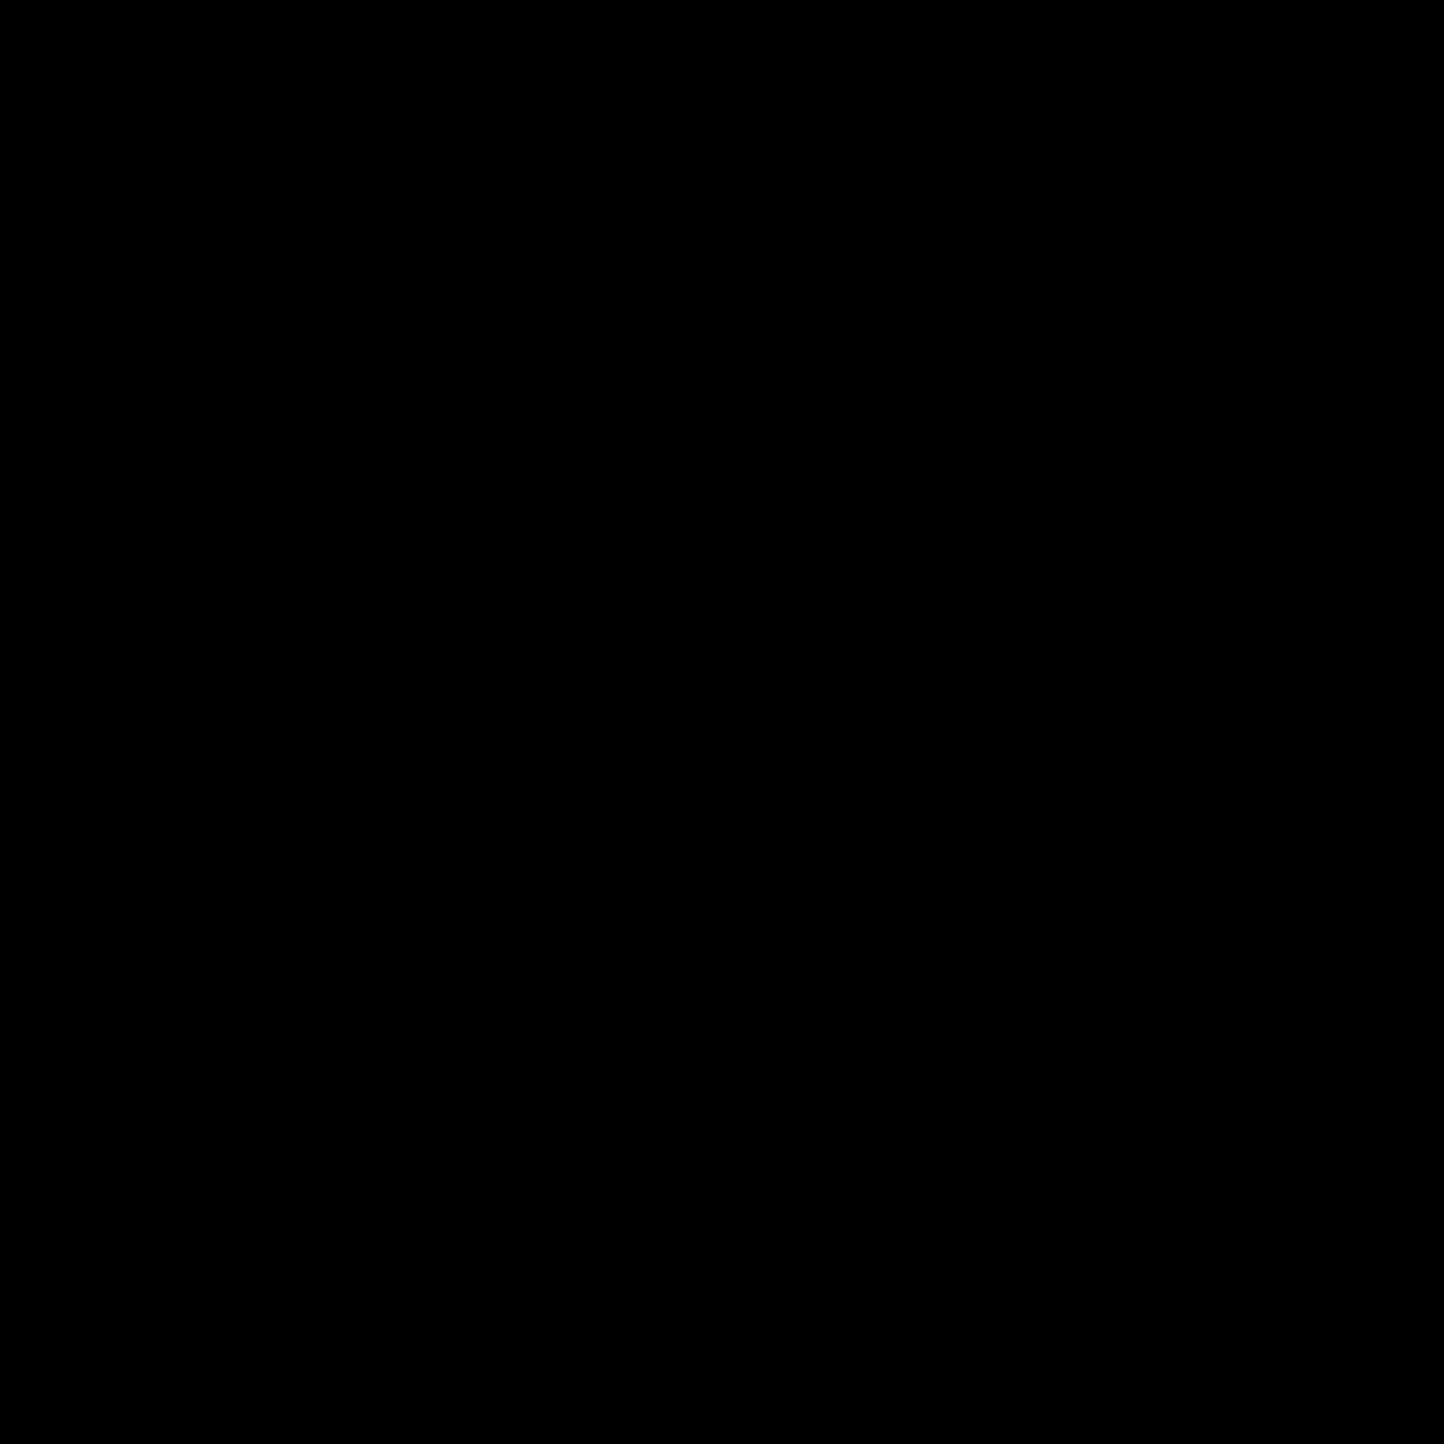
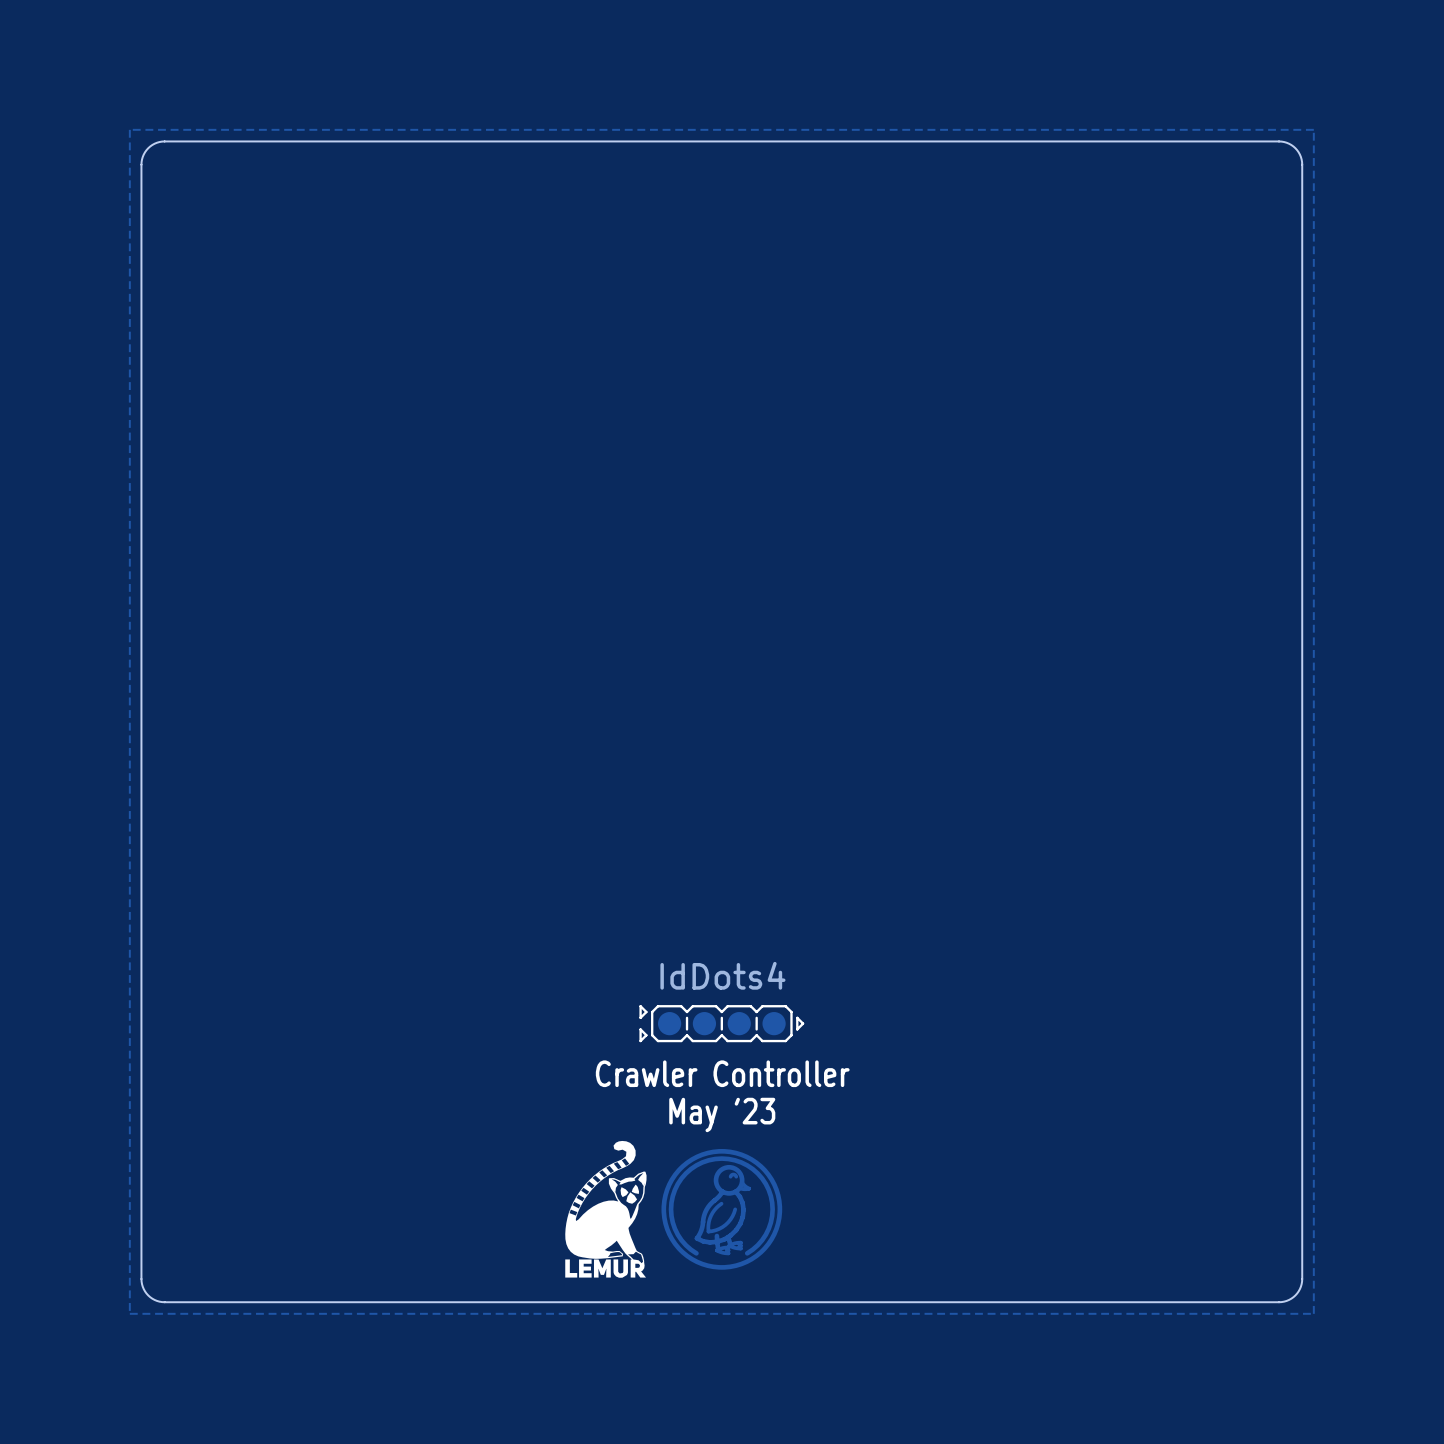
zone outline: none -> (1313, 129) (1313, 1313) (129, 1313) (129, 129) (1313, 129)
board edge: none -> (1279, 141) (164, 141) (154, 143) (148, 148) (142, 156) (141, 164) (141, 1279) (143, 1289) (148, 1295) (154, 1299) (164, 1302) (1279, 1302) (1286, 1300) (1295, 1295) (1300, 1286) (1302, 1279) (1302, 164) (1300, 156) (1295, 148) (1286, 142) (1279, 141)
drawing: none -> [639, 1005, 805, 1043]
text: none -> Crawler Controller (722, 1073)
text: none -> May '23 (722, 1114)
drawing: none -> [565, 1140, 783, 1278]

